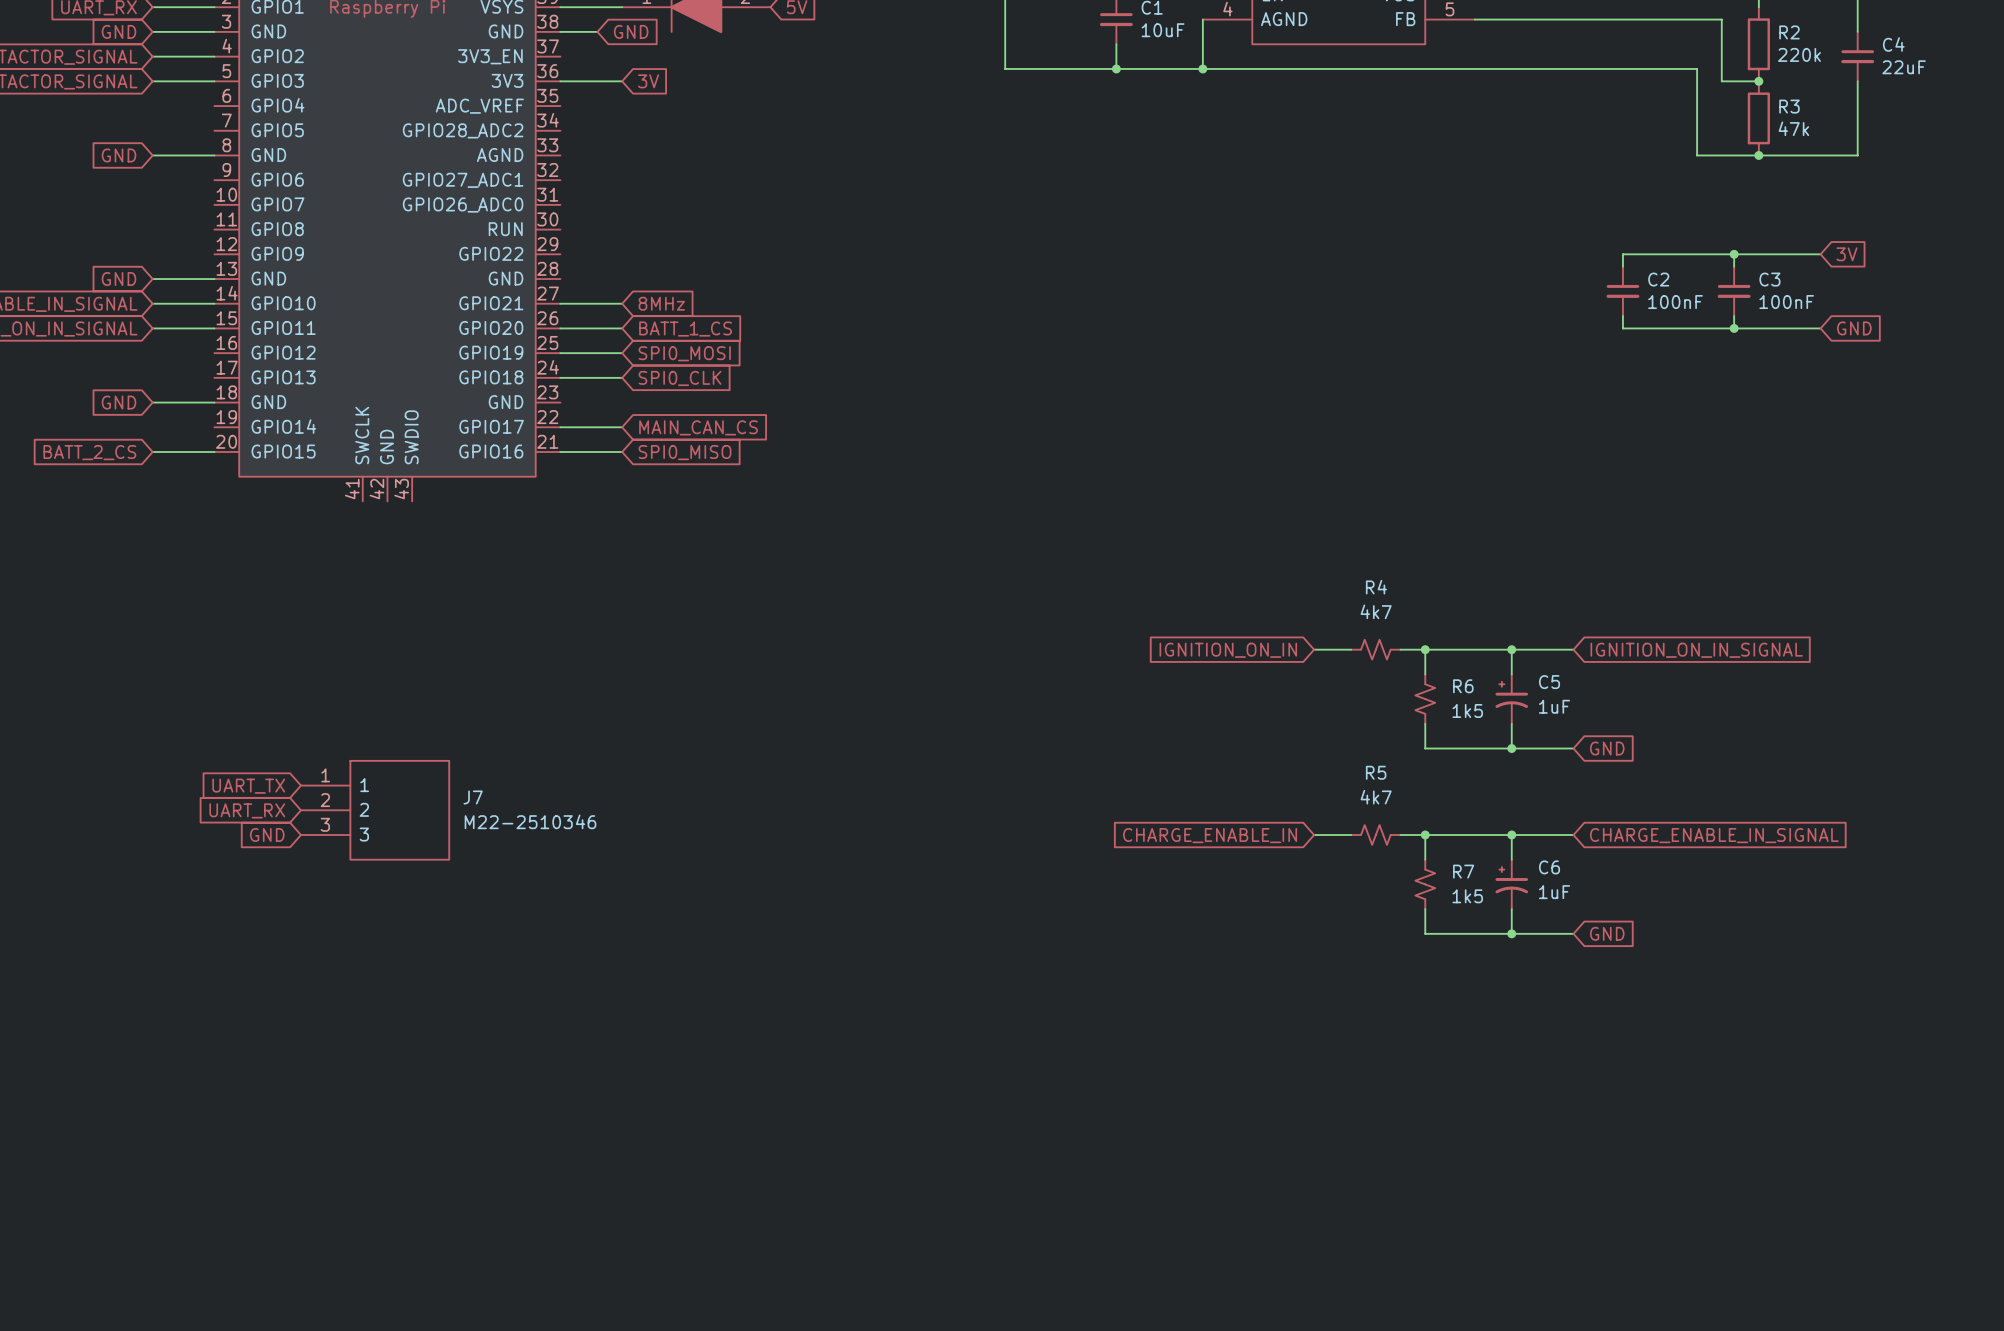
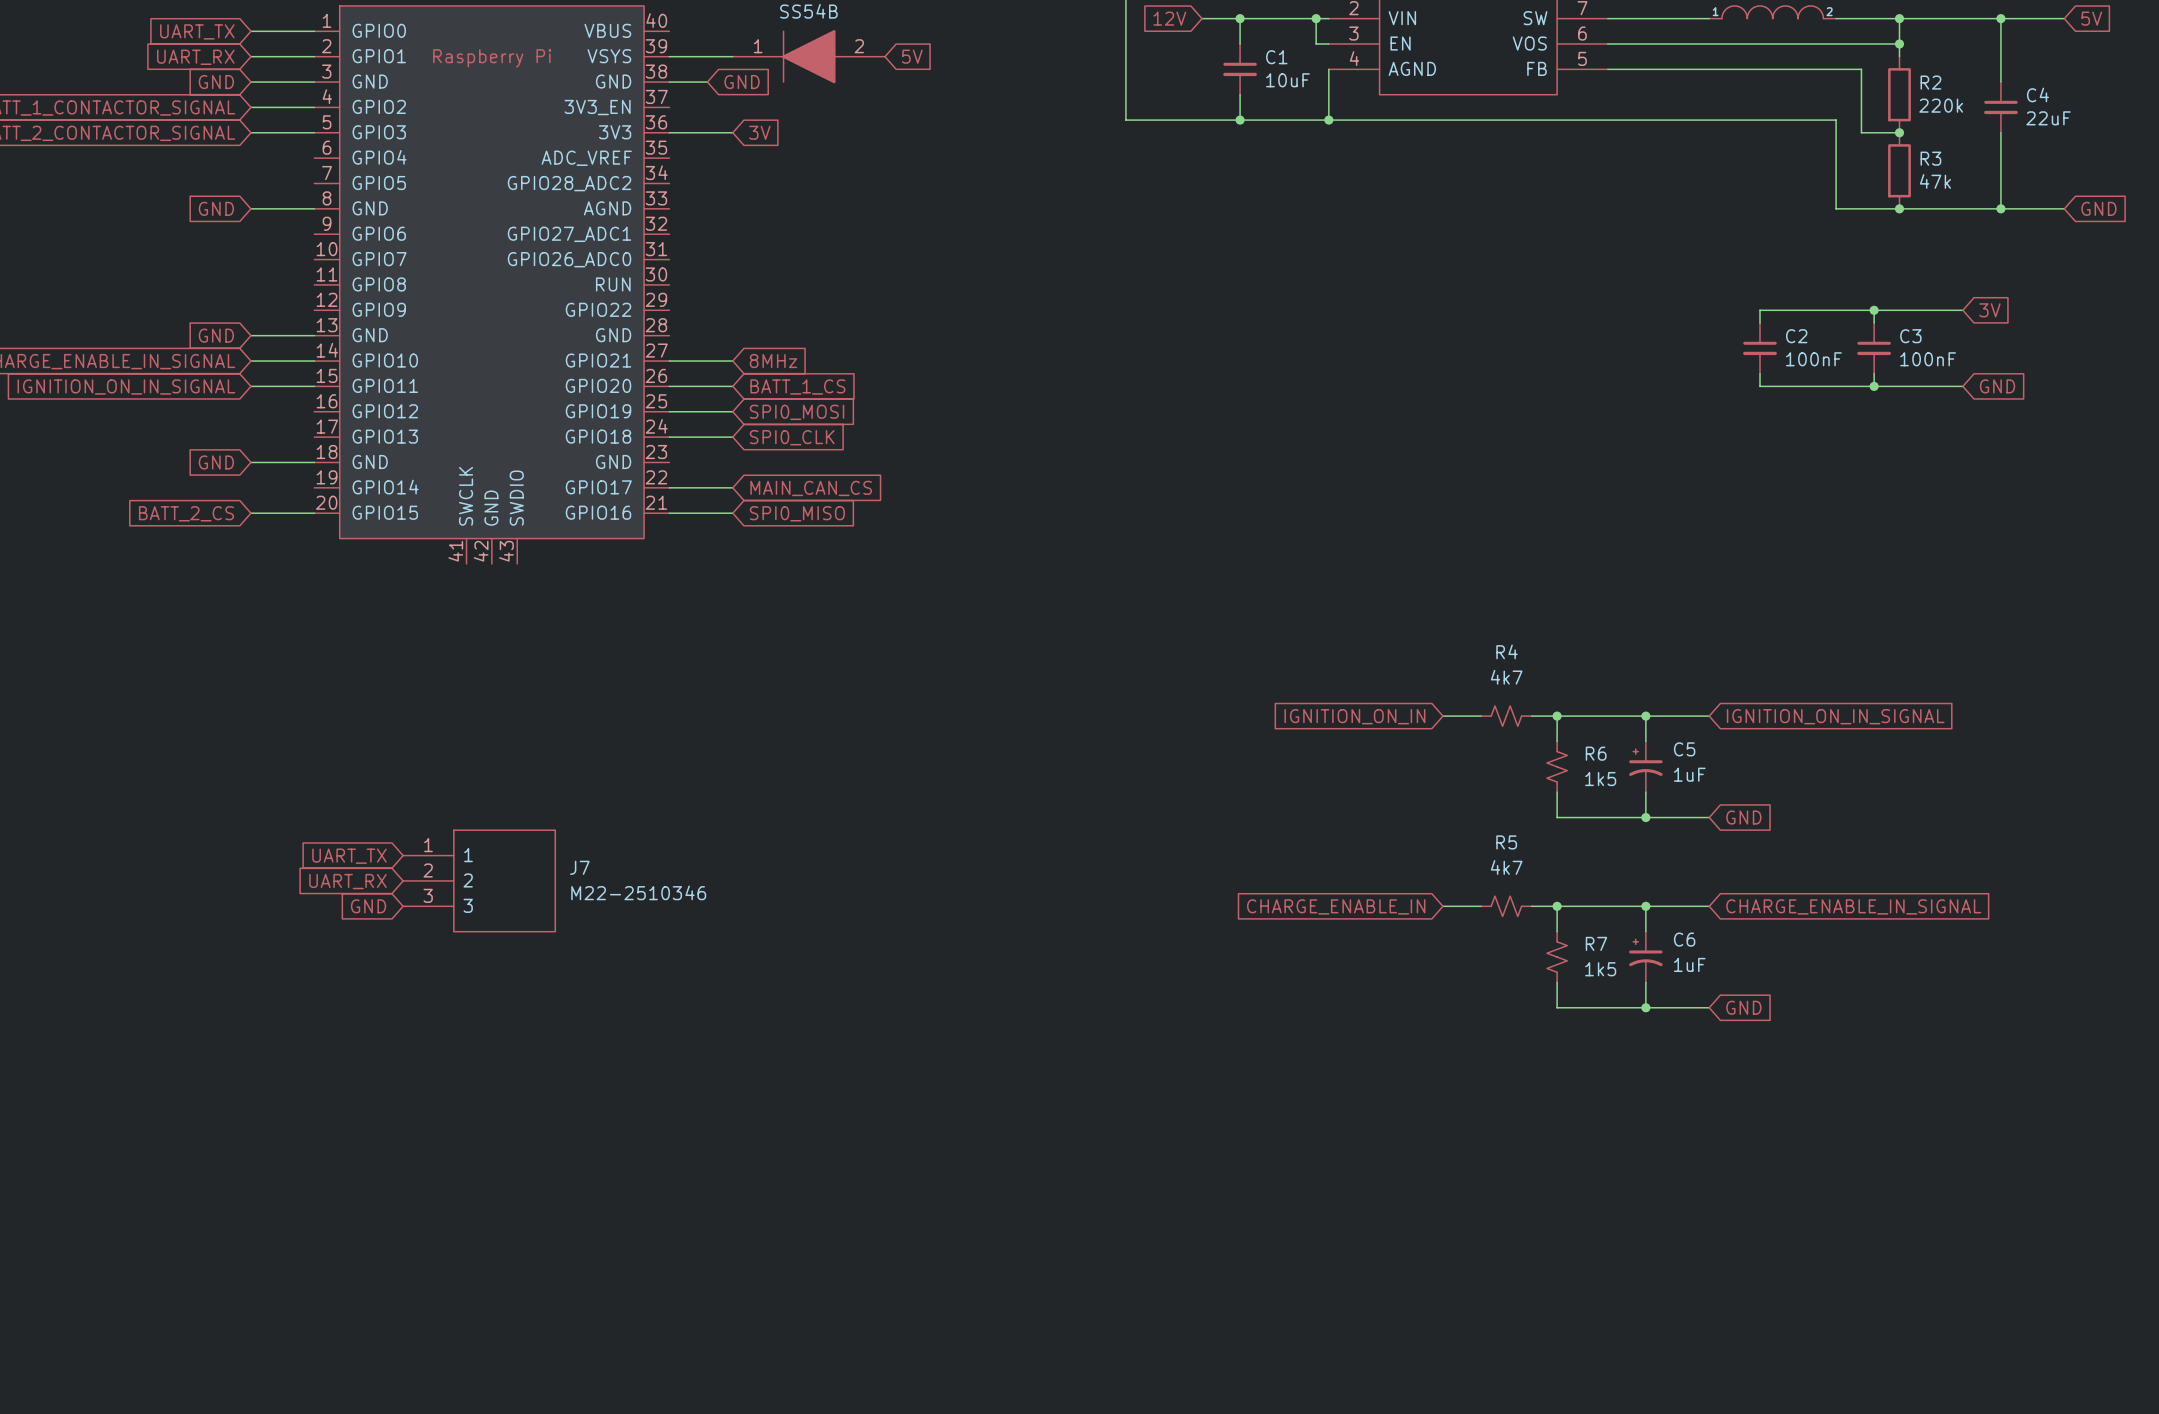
wire: none -> (2000, 208) (2064, 208)
junction: none -> (2000, 208)
global label: none -> GND (2098, 208)

